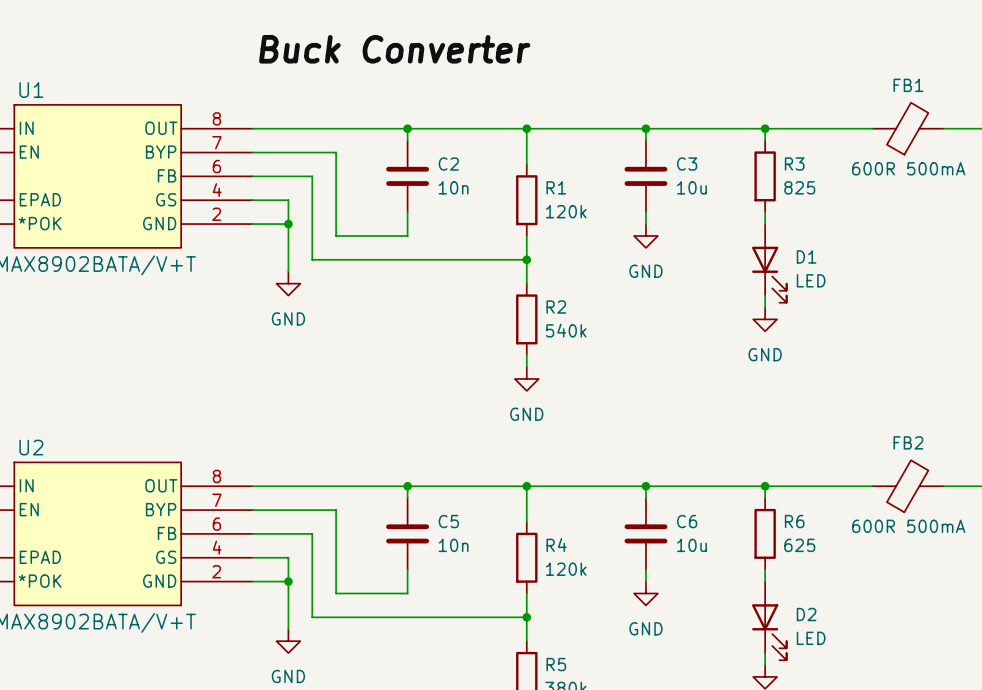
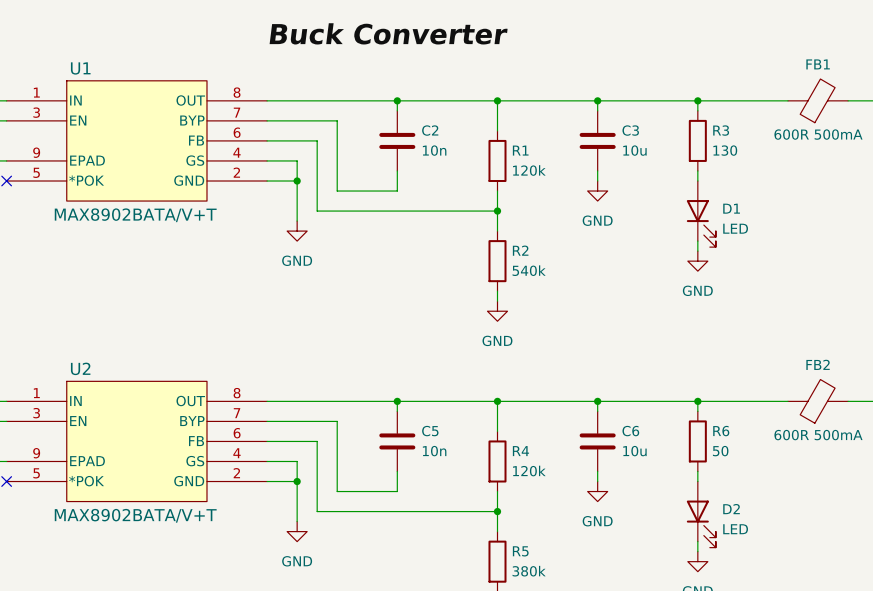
R3 value: 825 (799, 187) -> 130 (725, 150)
R6 value: 625 (799, 545) -> 50 (720, 451)

